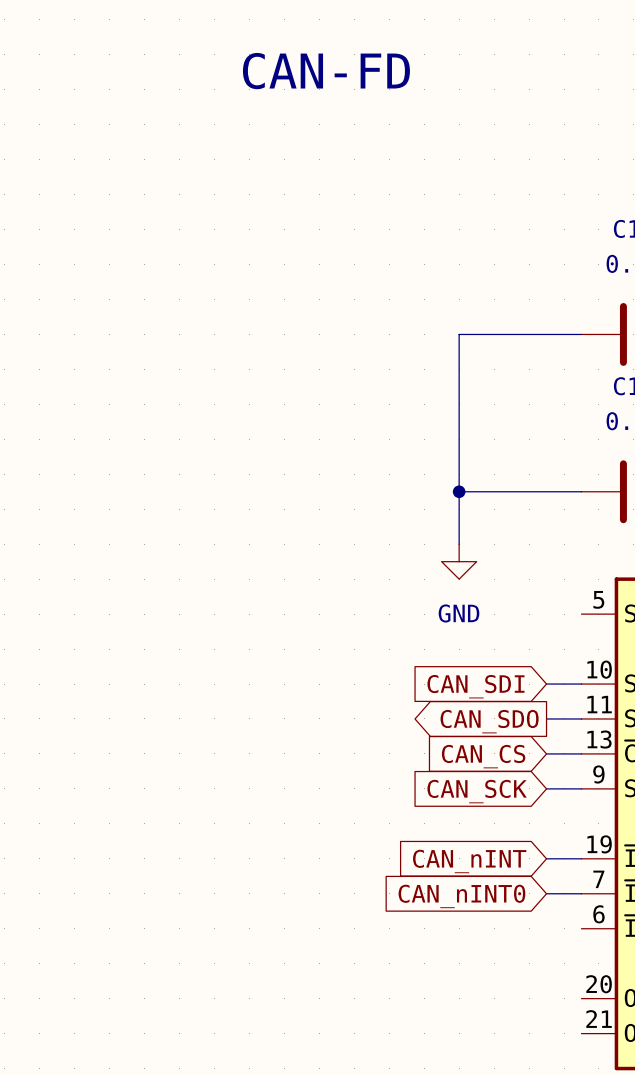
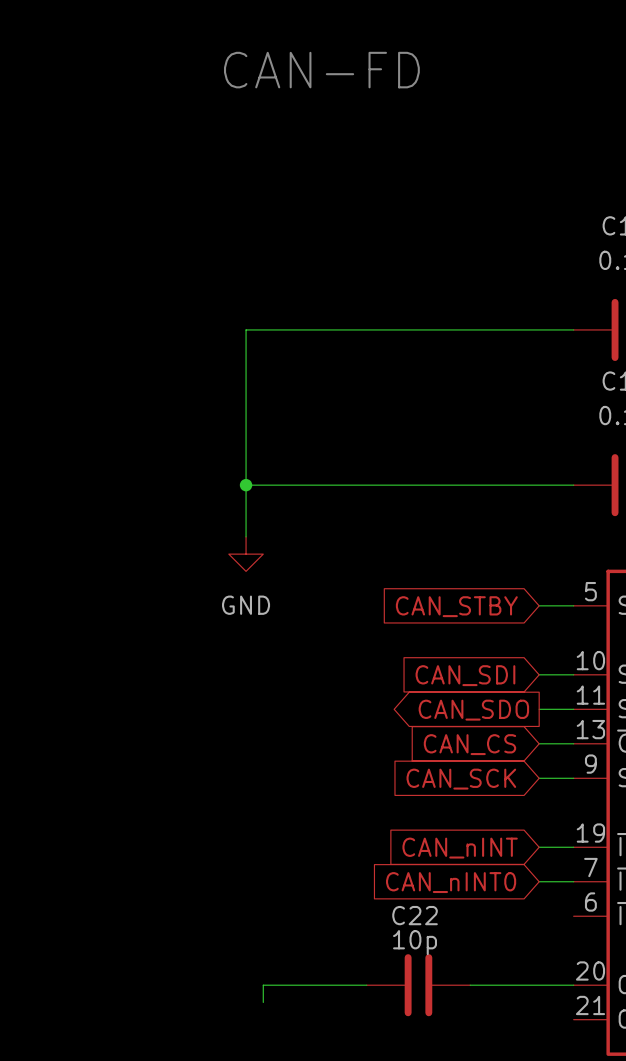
wire: (459, 334) (459, 544) -> (452, 329) (246, 329) (246, 536)
wire: none -> (246, 485) (452, 485)
junction: none -> (246, 485)
junction: (459, 491) -> none
power symbol position: GND (459, 561) -> GND (246, 554)
wire: none -> (539, 605) (573, 605)
global label: none -> CAN_STBY (456, 606)
wire: none -> (366, 985) (263, 985) (263, 1002)
C22: none -> 10p (418, 985)
wire: none -> (470, 985) (573, 985)

